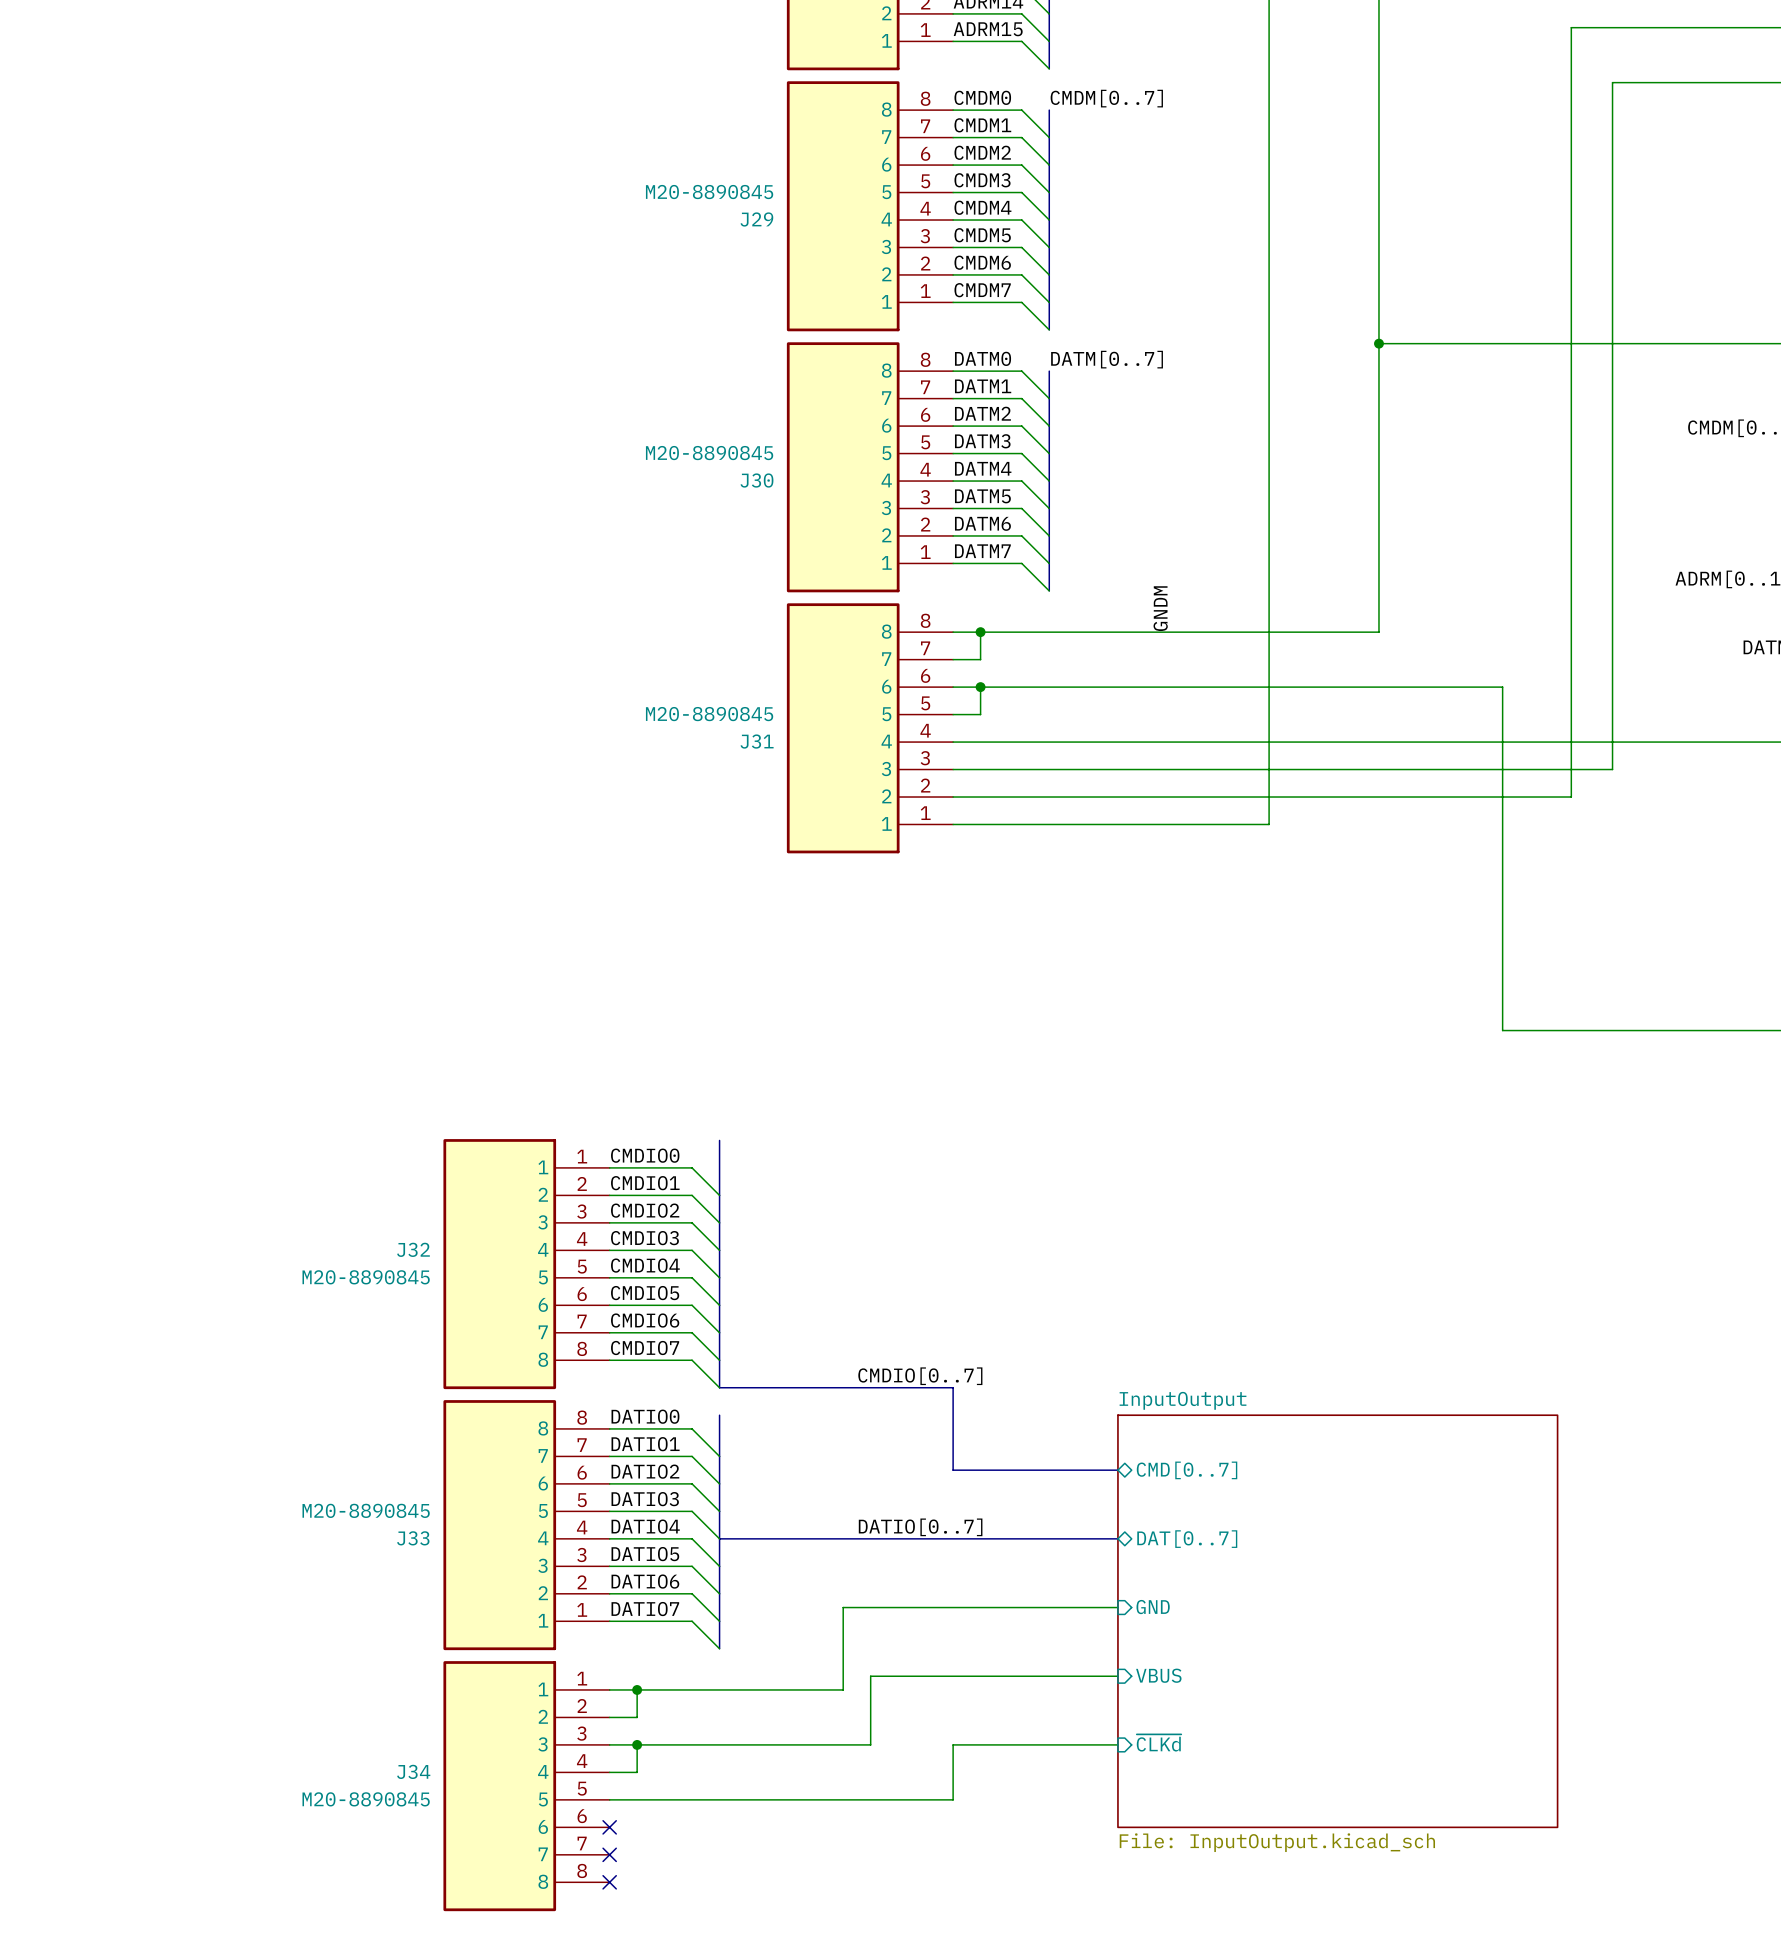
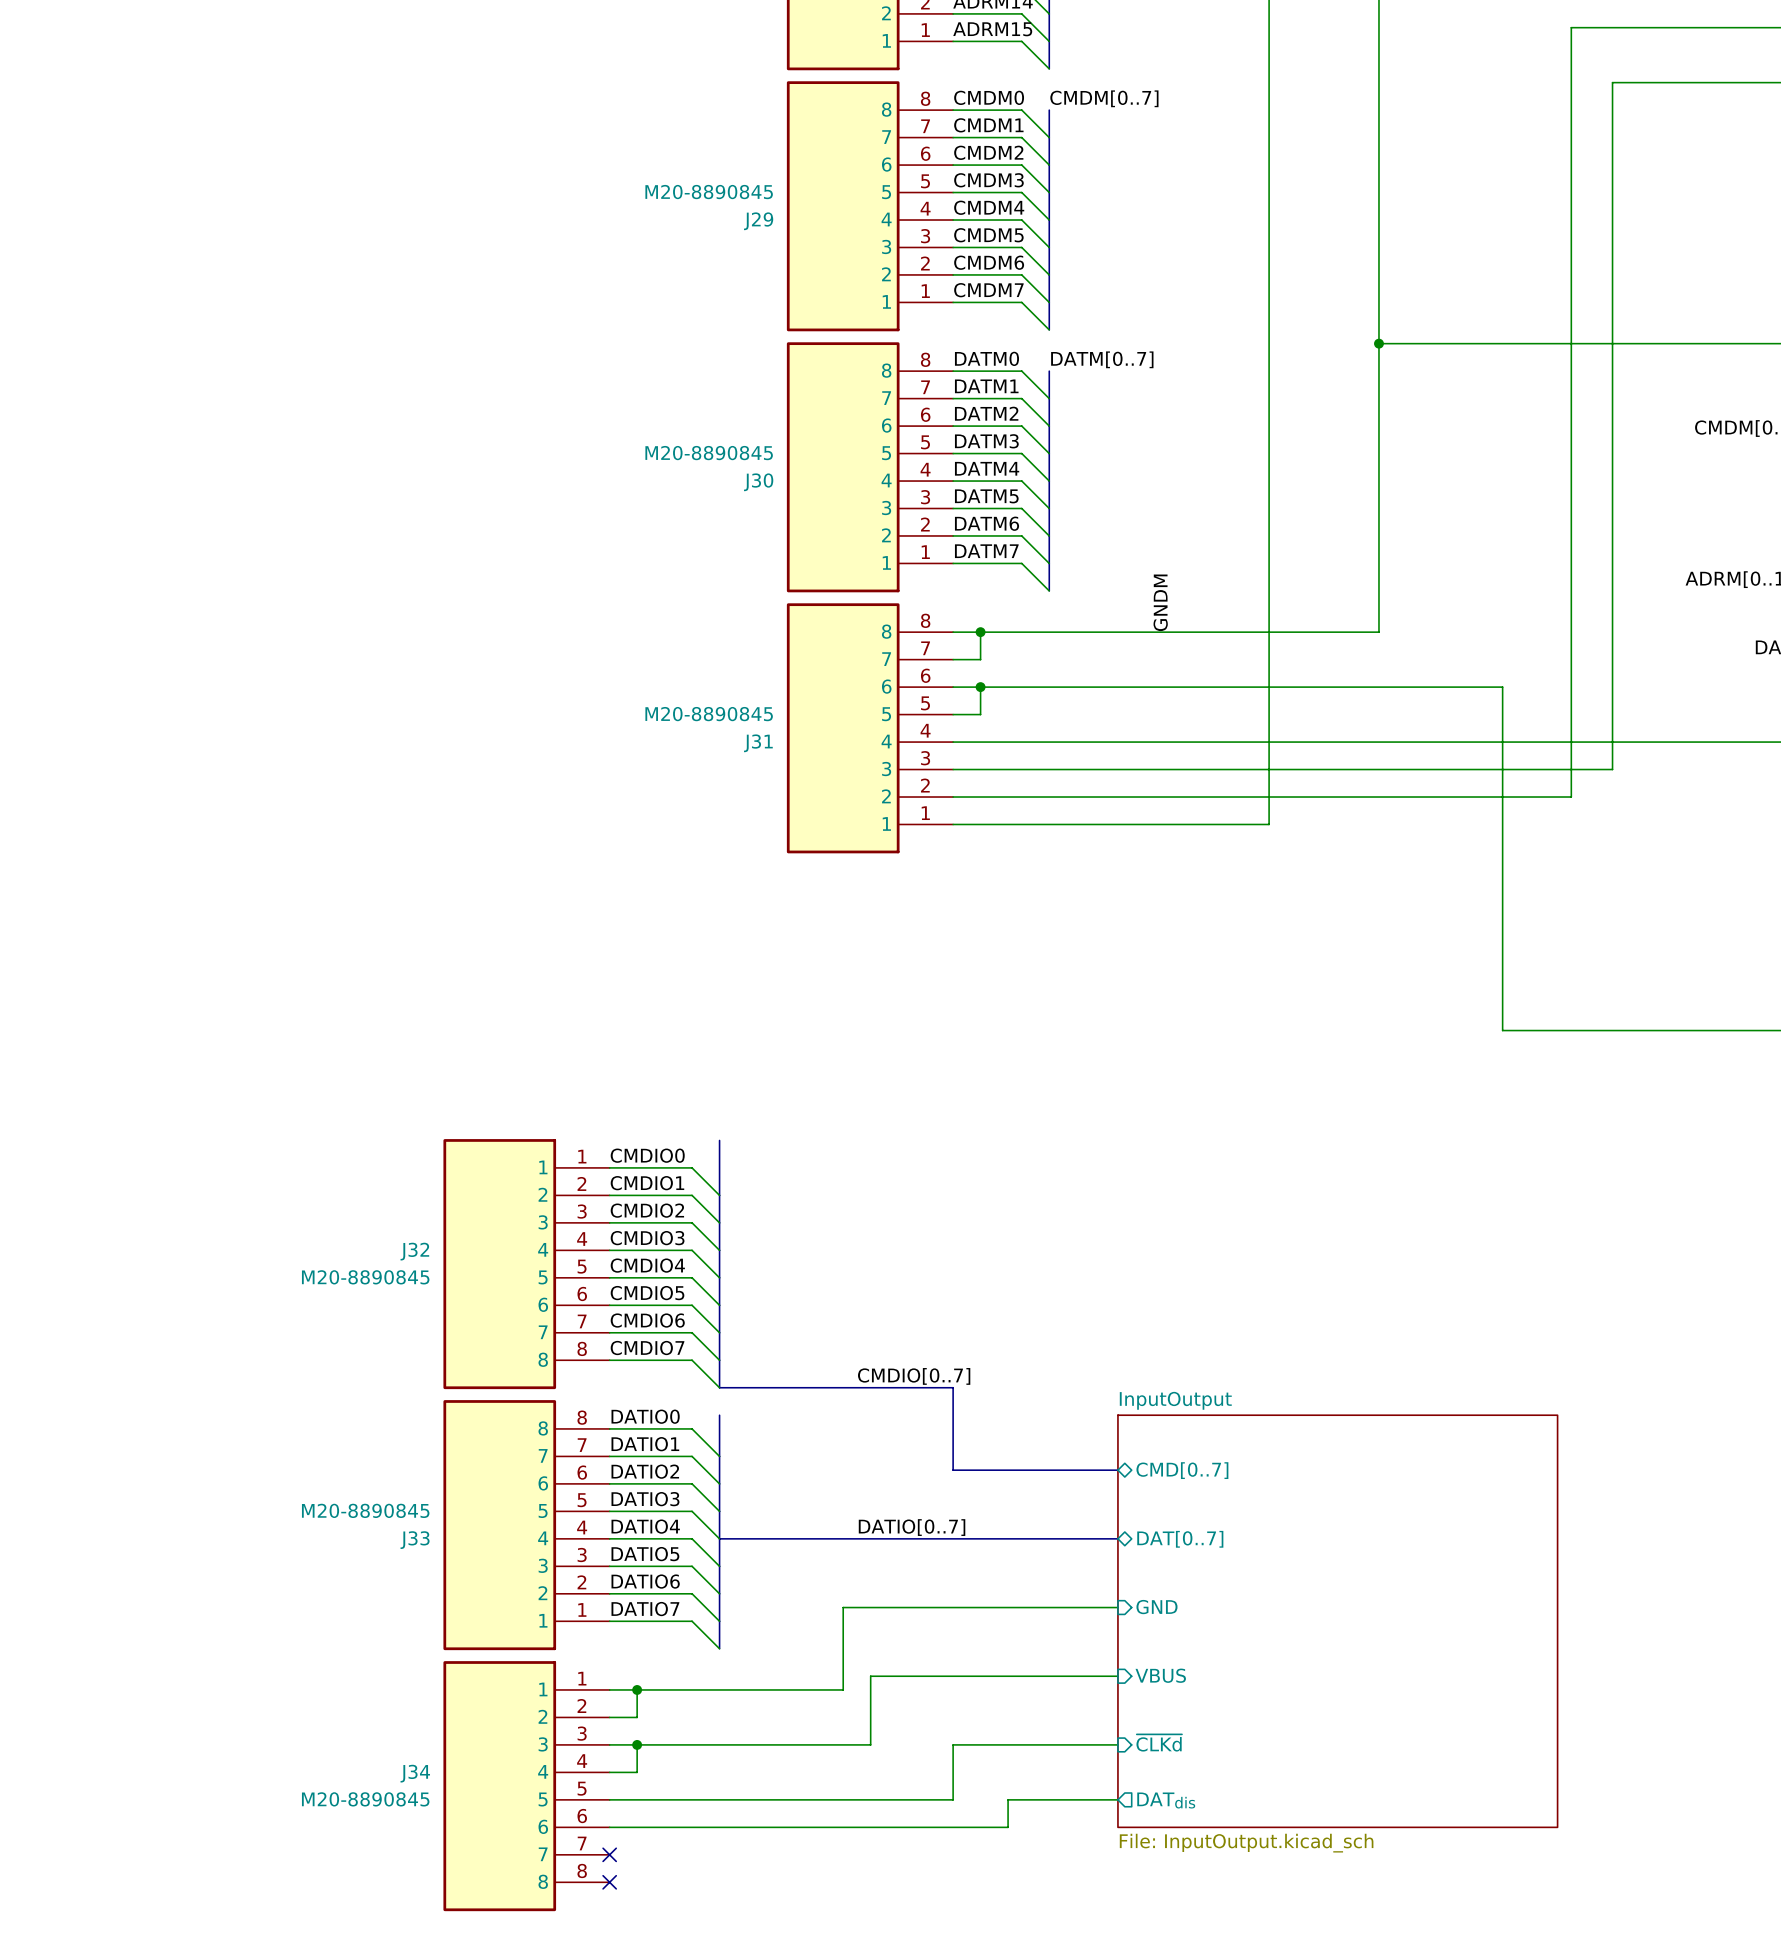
wire: none -> (1117, 1799) (1008, 1799) (1008, 1827) (609, 1827)
sheet pin: none -> DATdis (1166, 1800)
no-connect mark: (609, 1827) -> none

